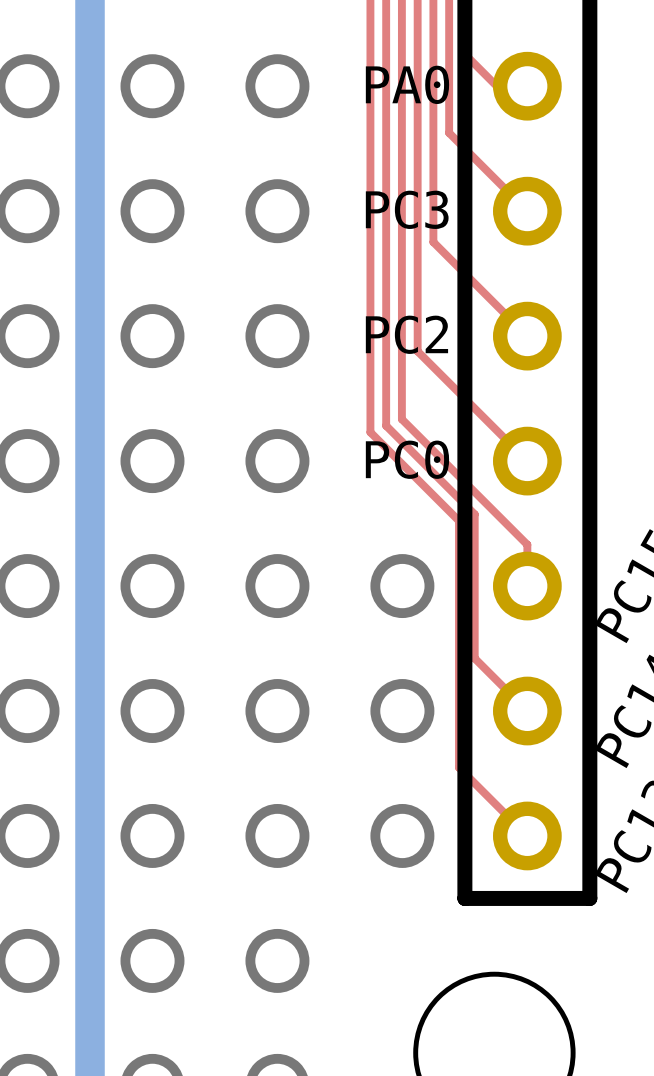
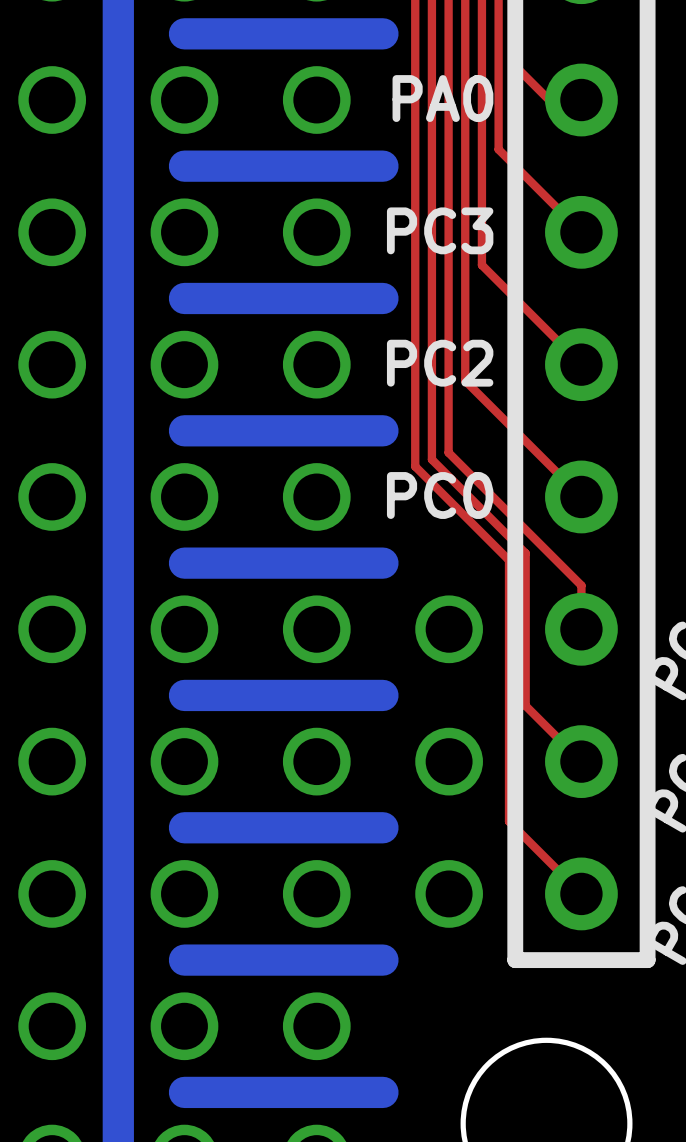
bottom track: none -> (184, 33) (382, 33)
bottom track: none -> (184, 166) (382, 166)
bottom track: none -> (184, 298) (382, 298)
bottom track: none -> (184, 430) (382, 430)
bottom track: none -> (184, 563) (382, 563)
bottom track: none -> (184, 695) (382, 695)
bottom track: none -> (184, 827) (382, 827)
bottom track: none -> (184, 960) (382, 960)
bottom track: none -> (184, 1092) (382, 1092)

